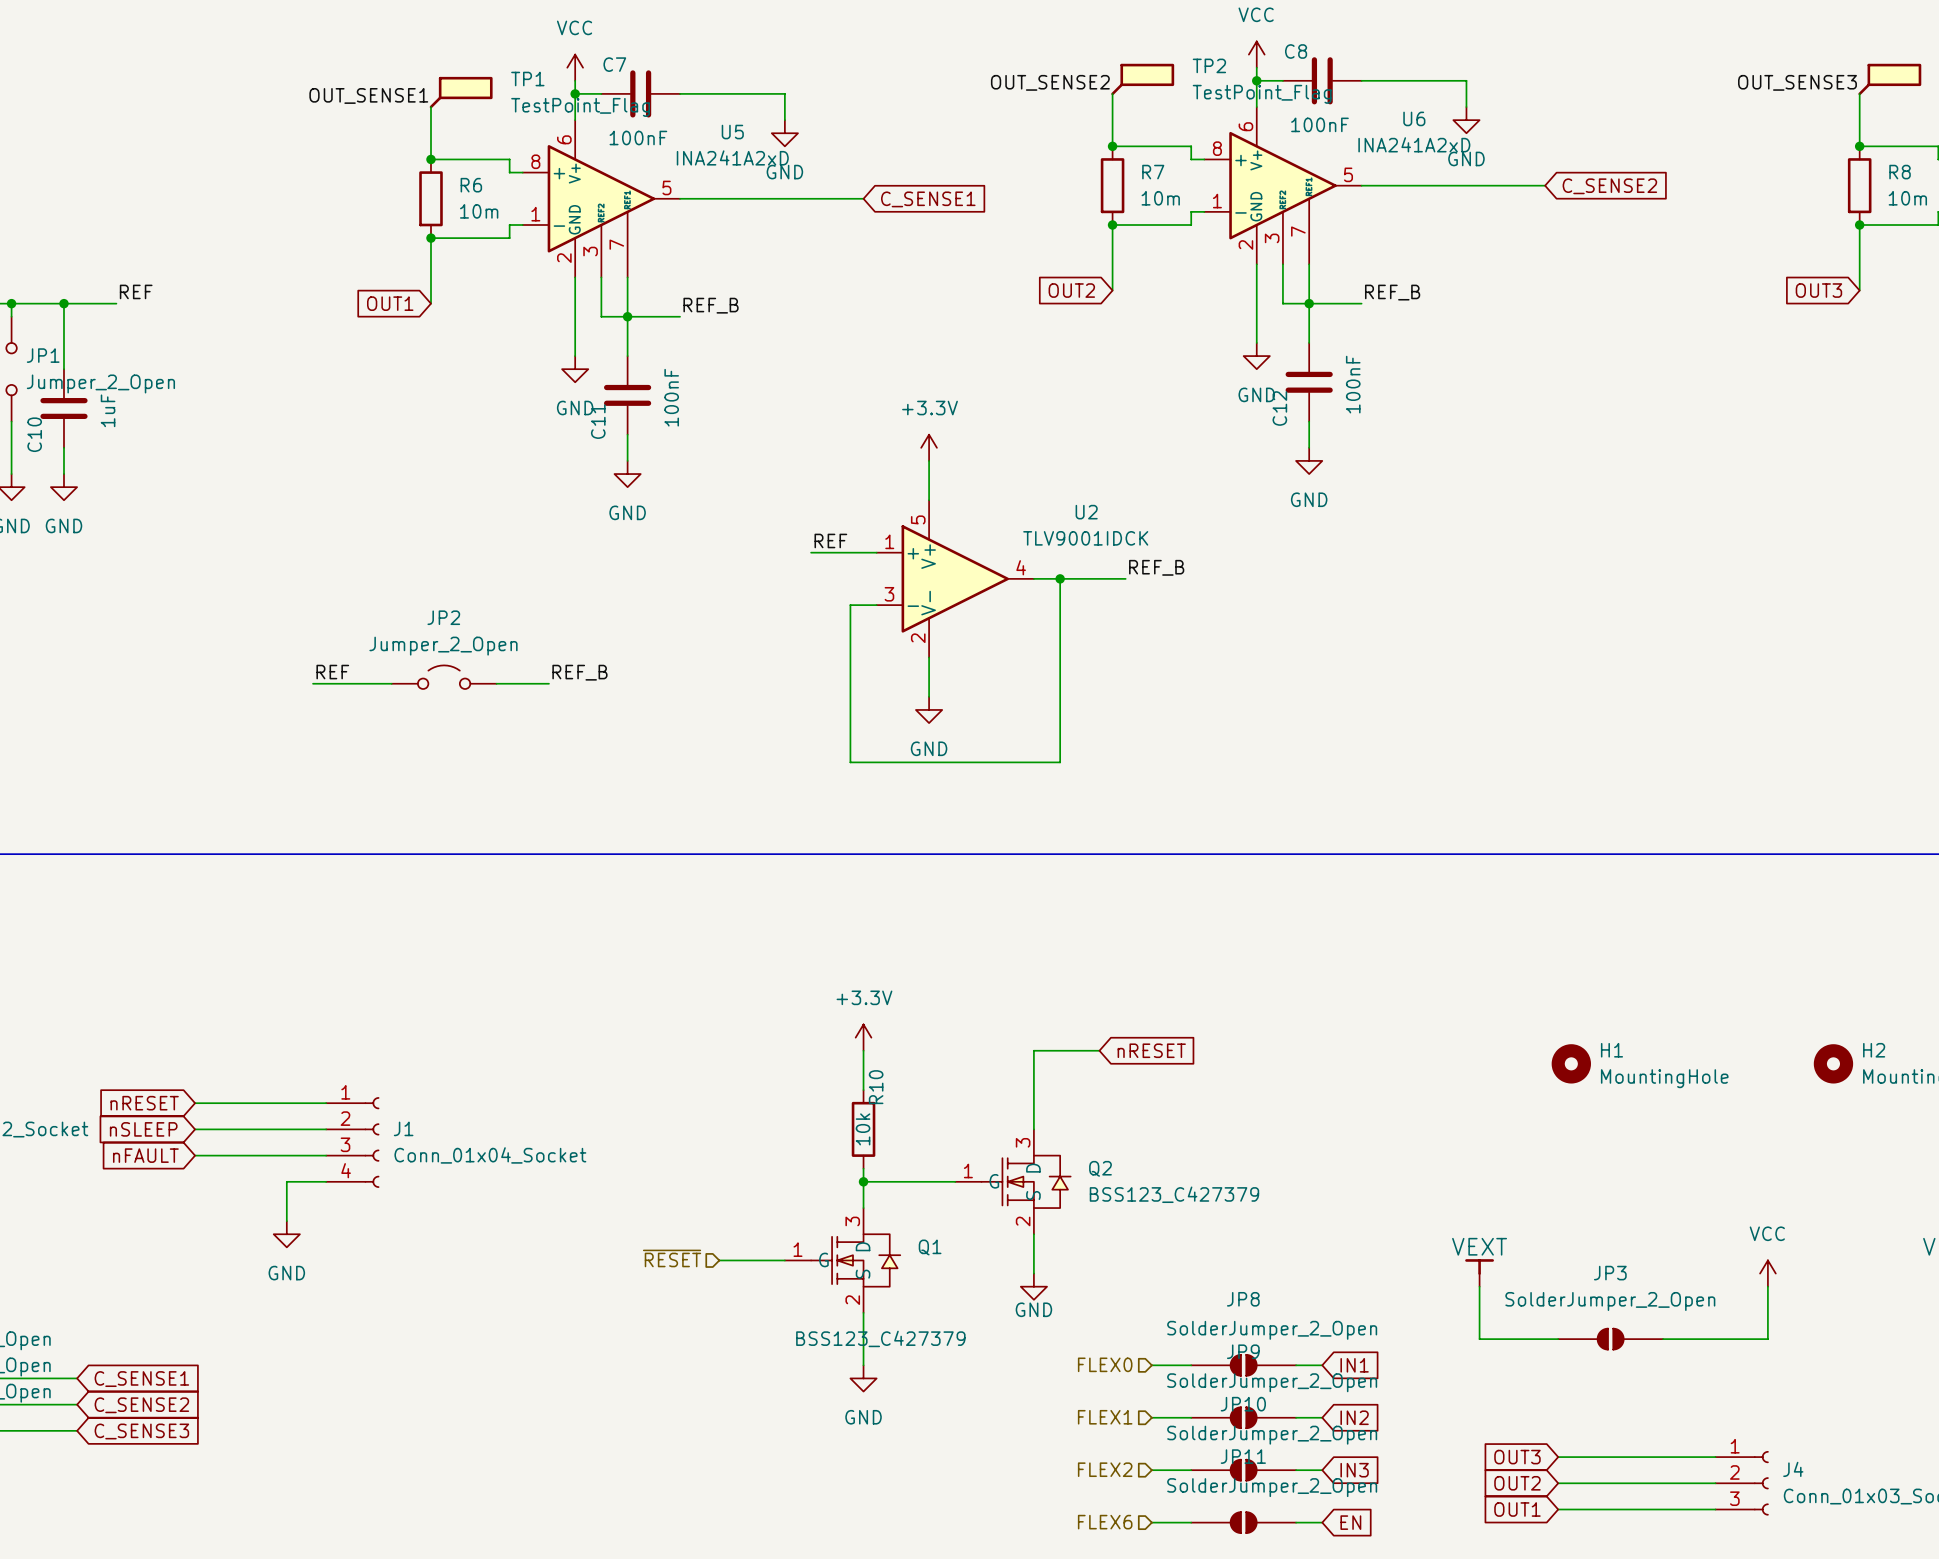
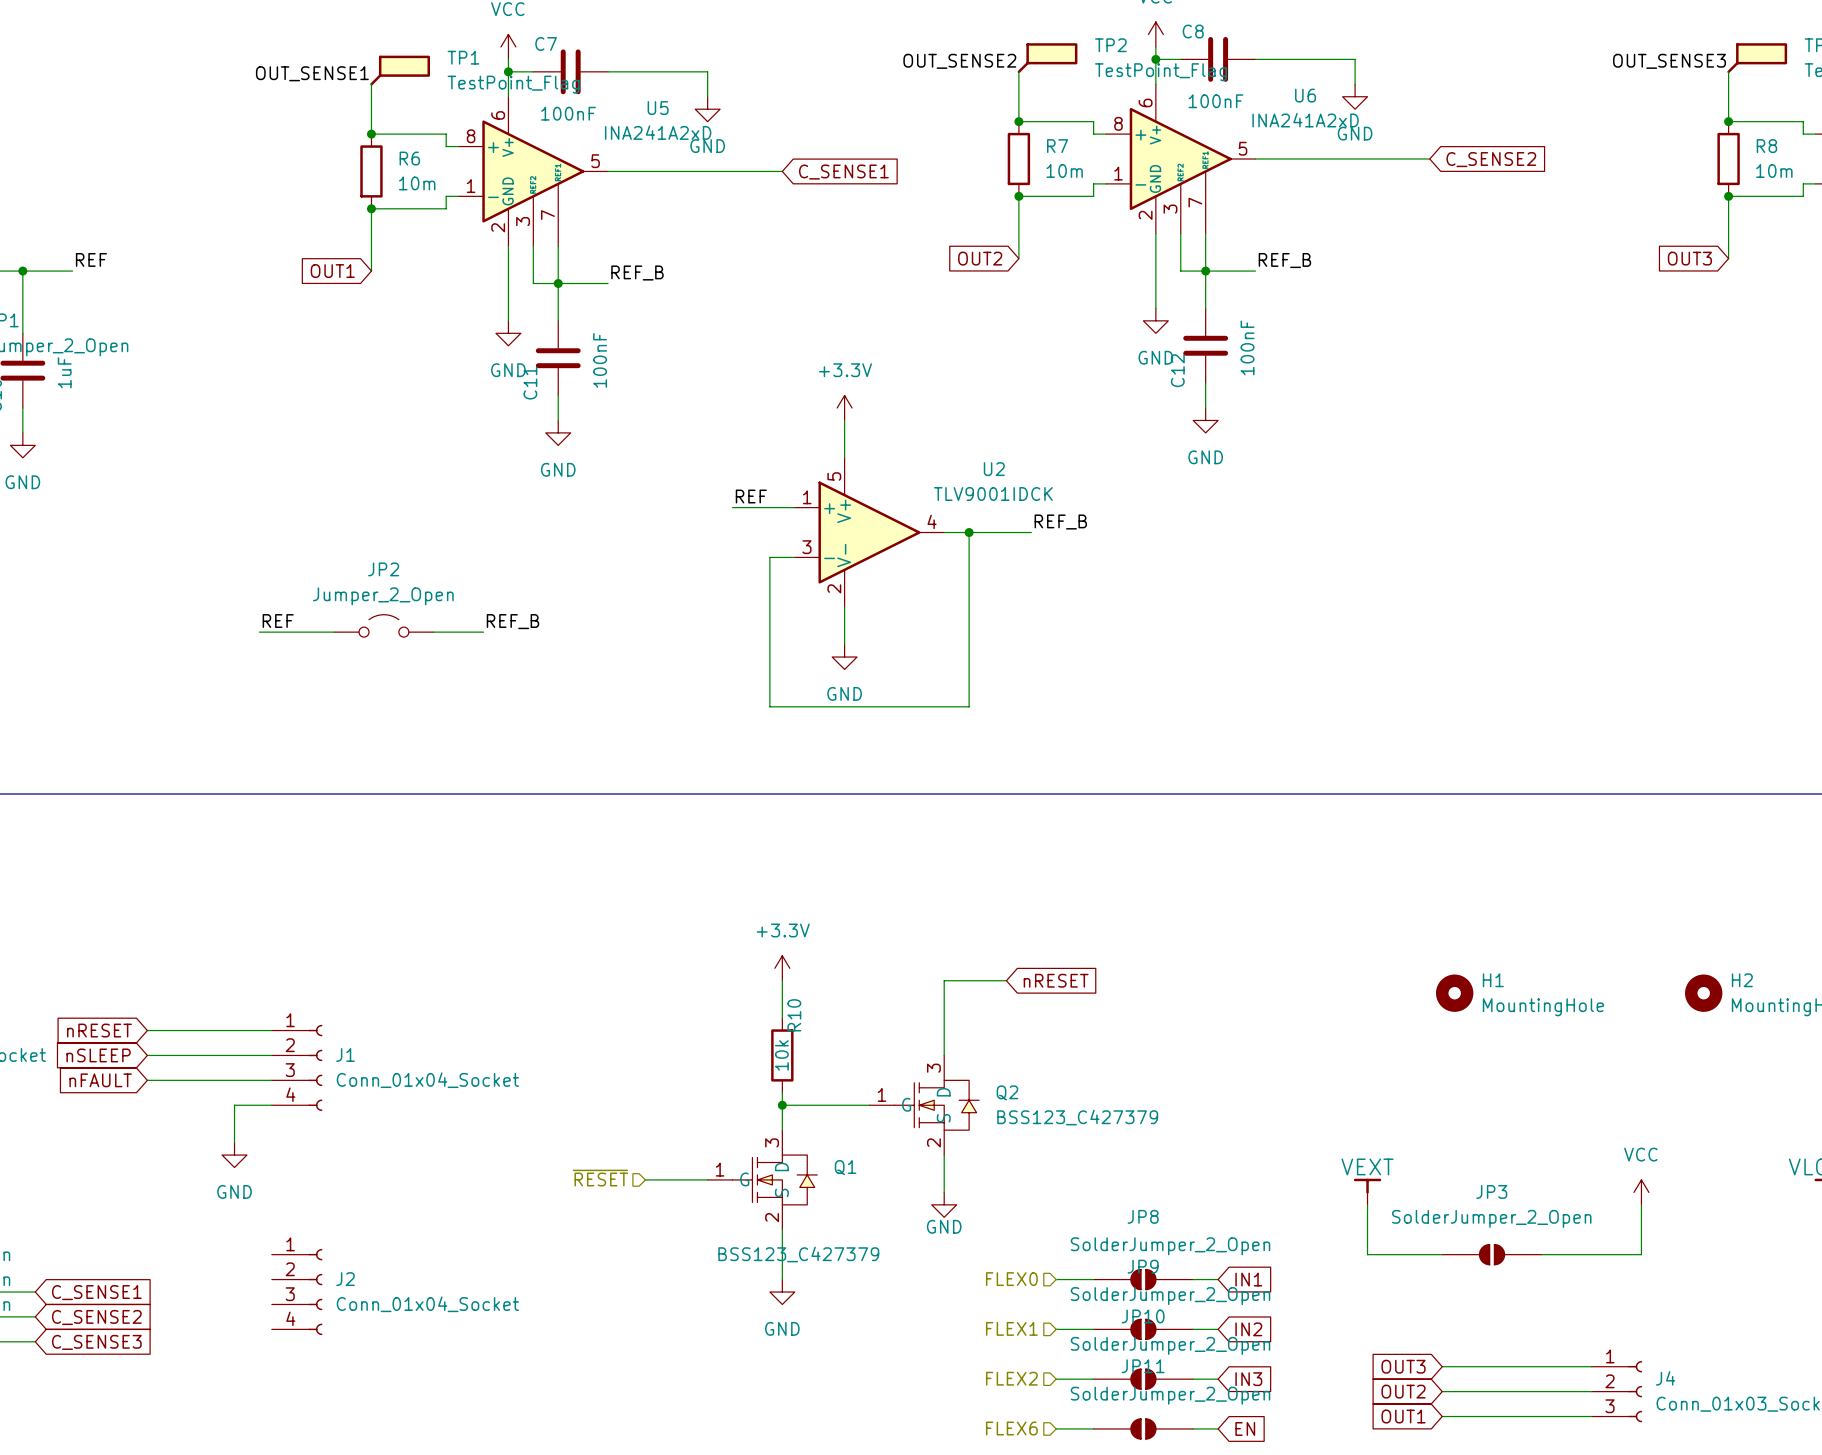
J2: none -> Conn_01x04_Socket (297, 1292)

